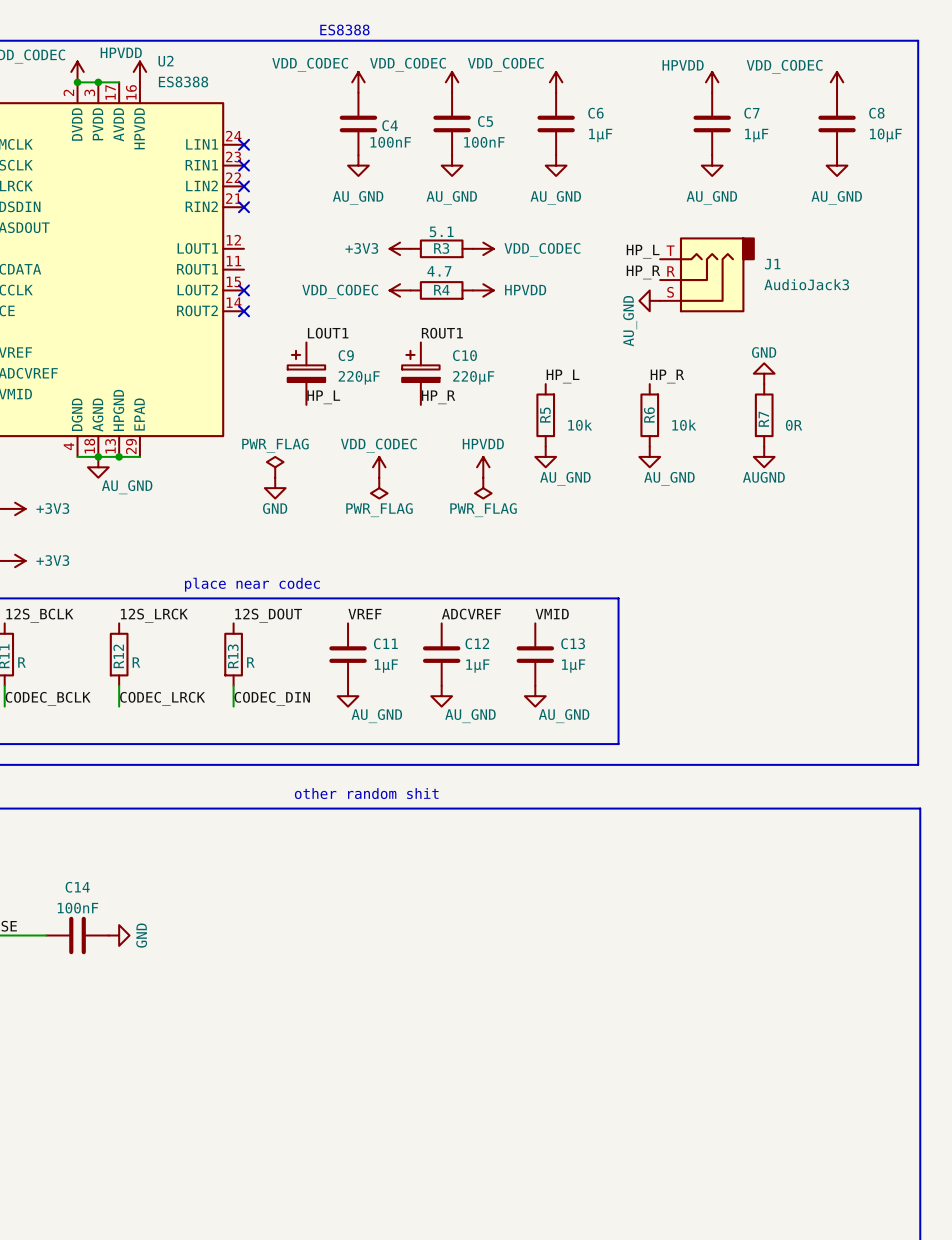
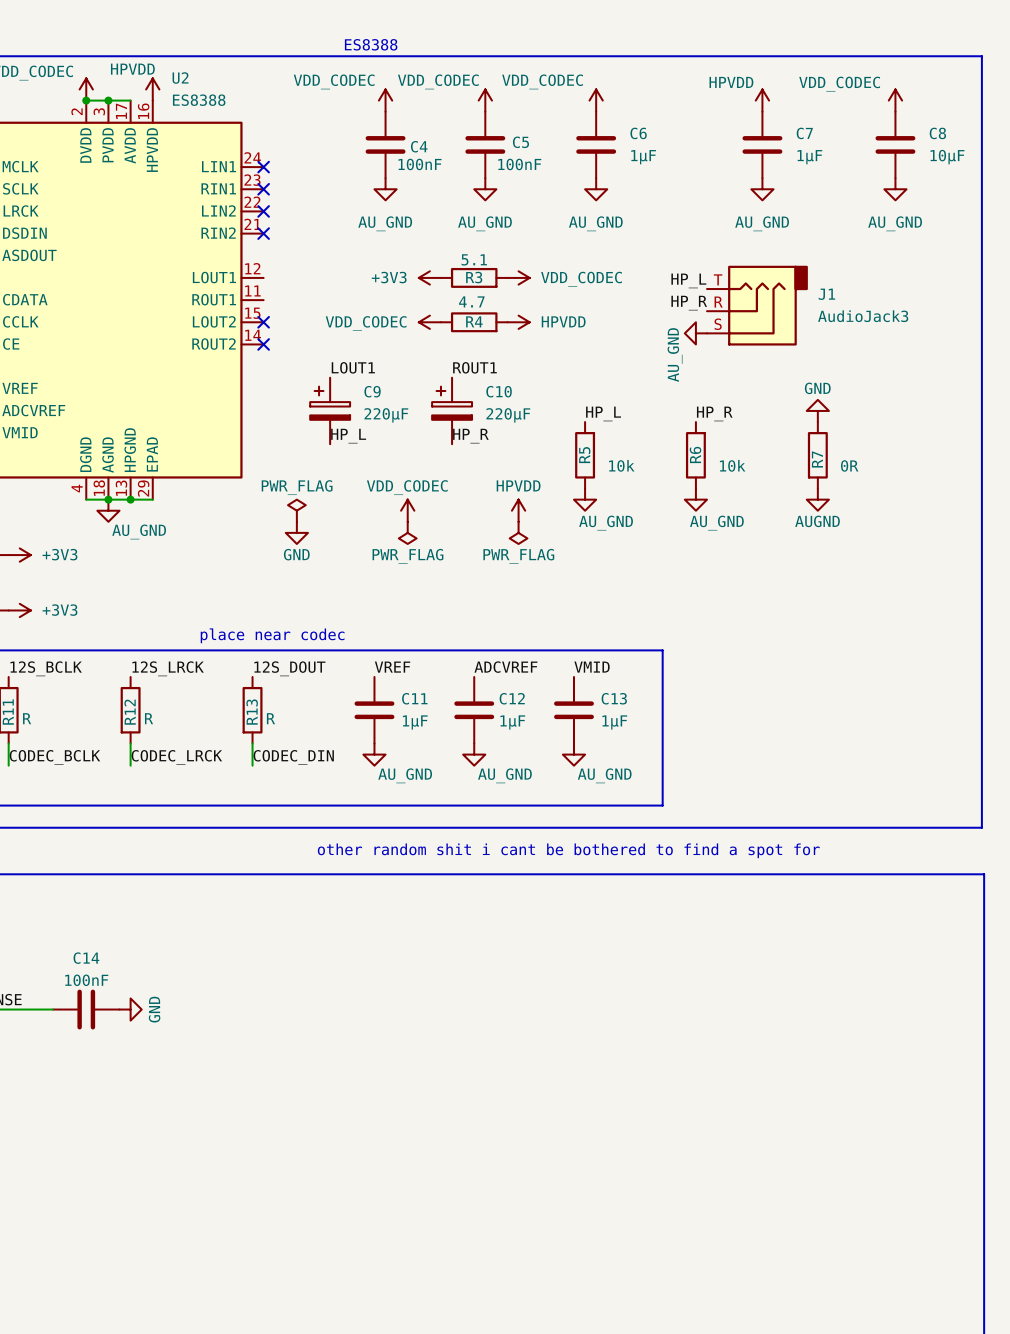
text: none -> other random shit i cant be bothered to find a spot for (568, 850)
text: other random shit (366, 793) -> none

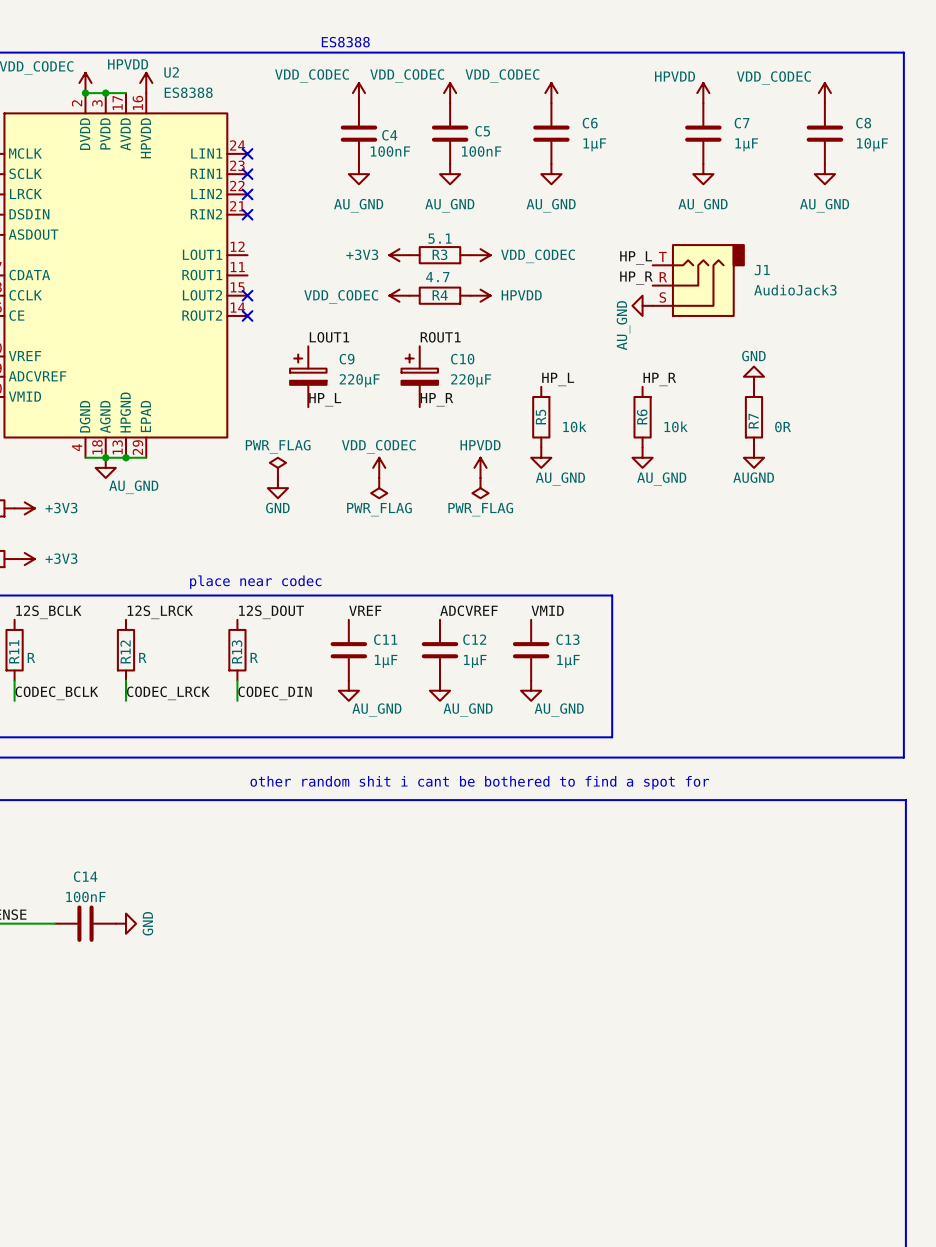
text position: other random shit i cant be bothered to find a spot for (568, 850) -> other random shit i cant be bothered to find a spot for (479, 782)

